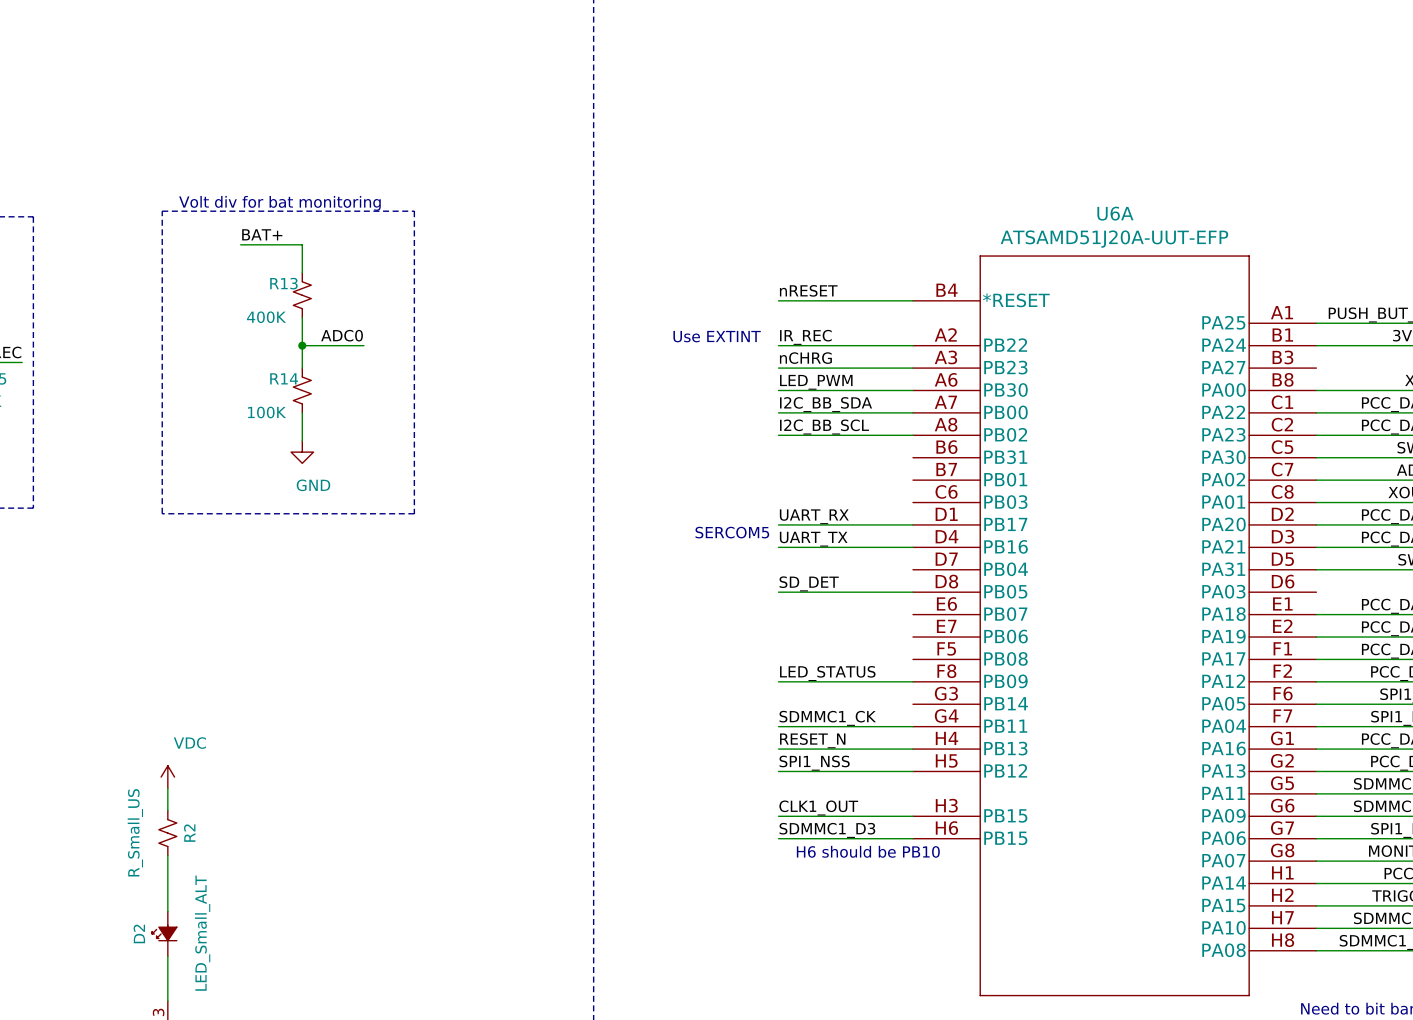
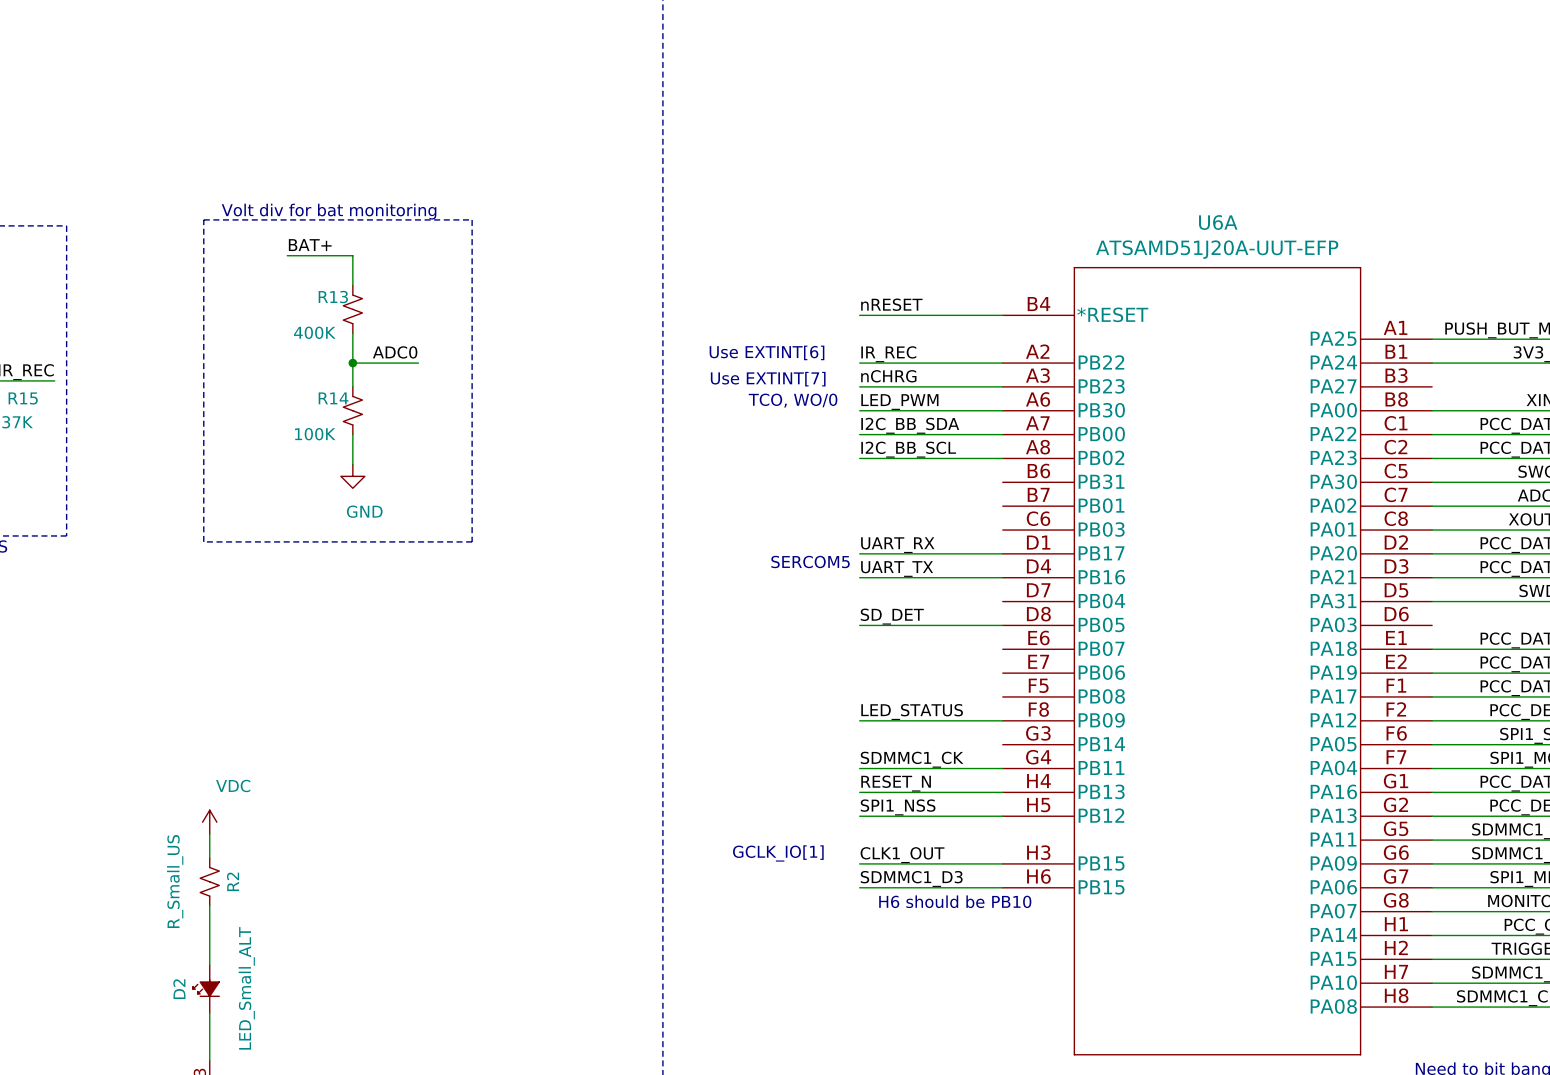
text: none -> Use EXTINT[6] (767, 352)
text: Use EXTINT (717, 336) -> none
text: none -> Use EXTINT[7] (768, 379)
text: none -> TCO, WO/0 (793, 400)
text: none -> GCLK_IO[1] (778, 853)

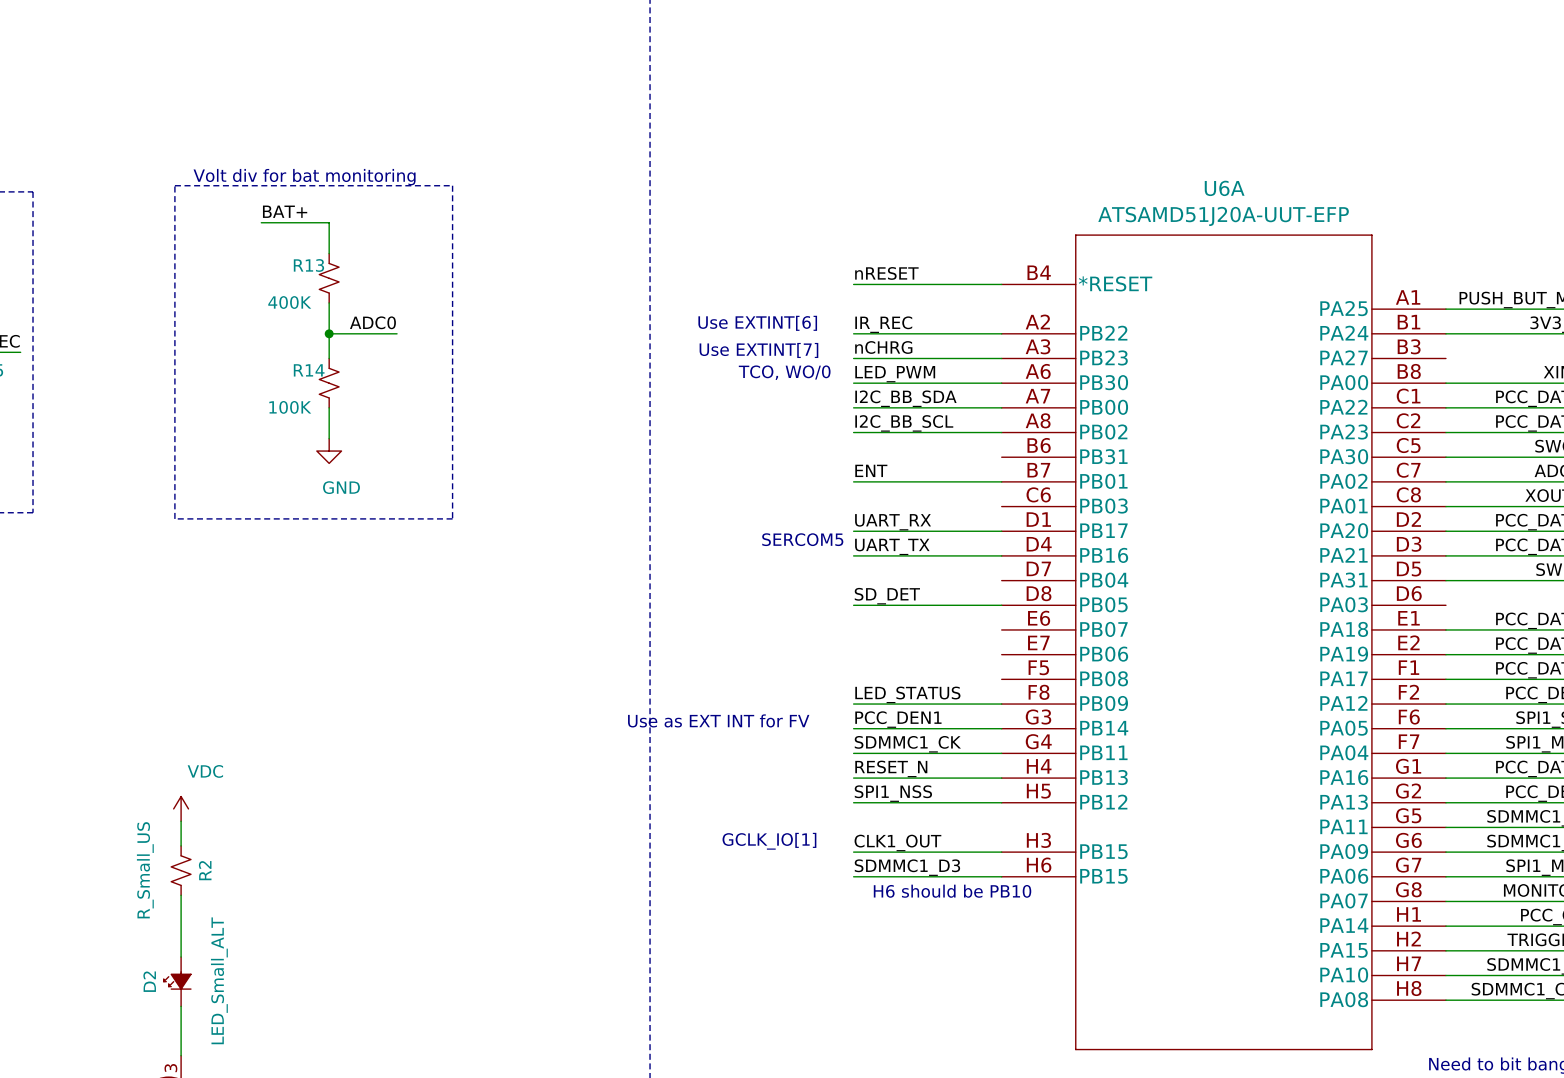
label: none -> ENT (871, 470)
wire: none -> (853, 481) (1001, 481)
label: none -> PCC_DEN1 (898, 719)
text: none -> Use as EXT INT for FV (718, 720)
wire: none -> (853, 728) (1001, 728)

